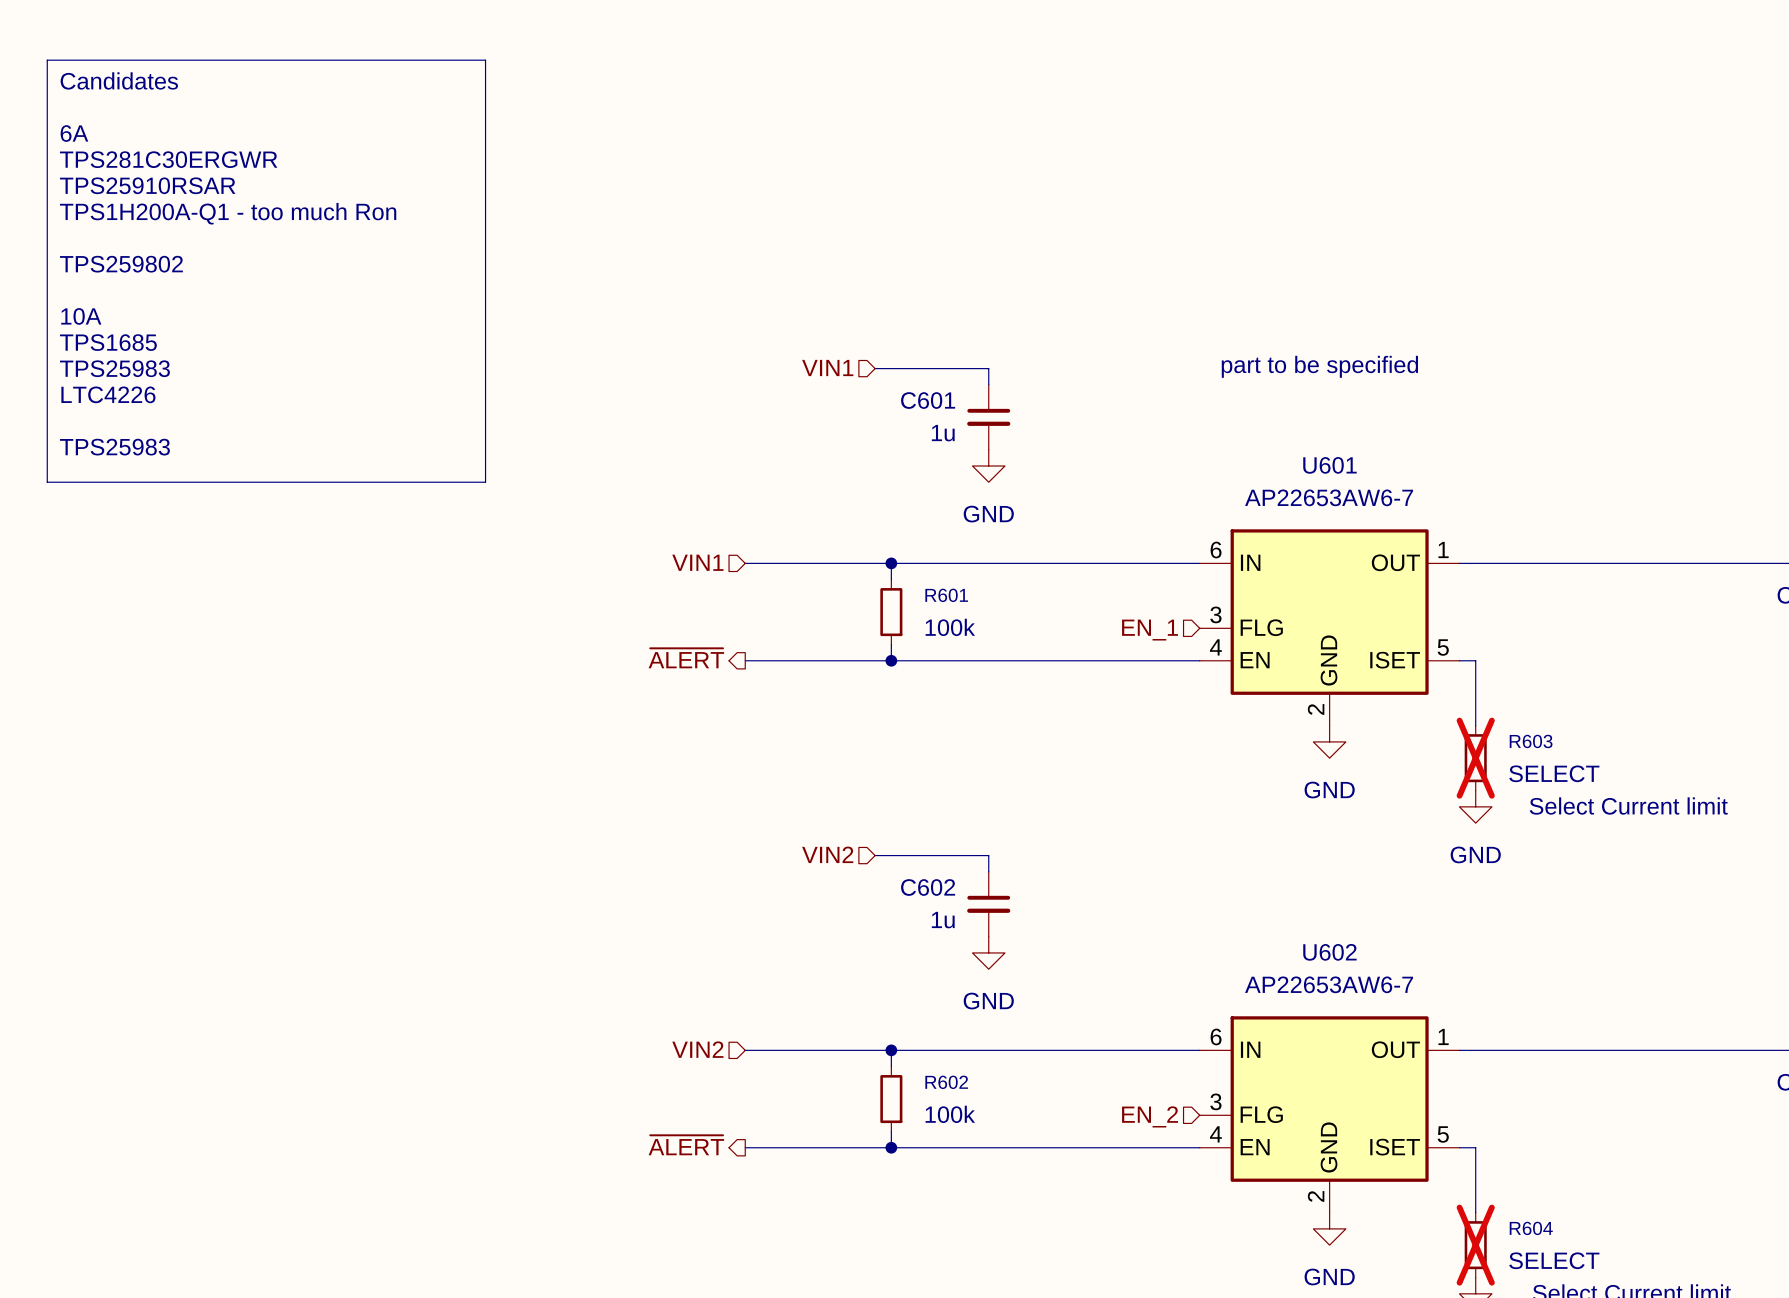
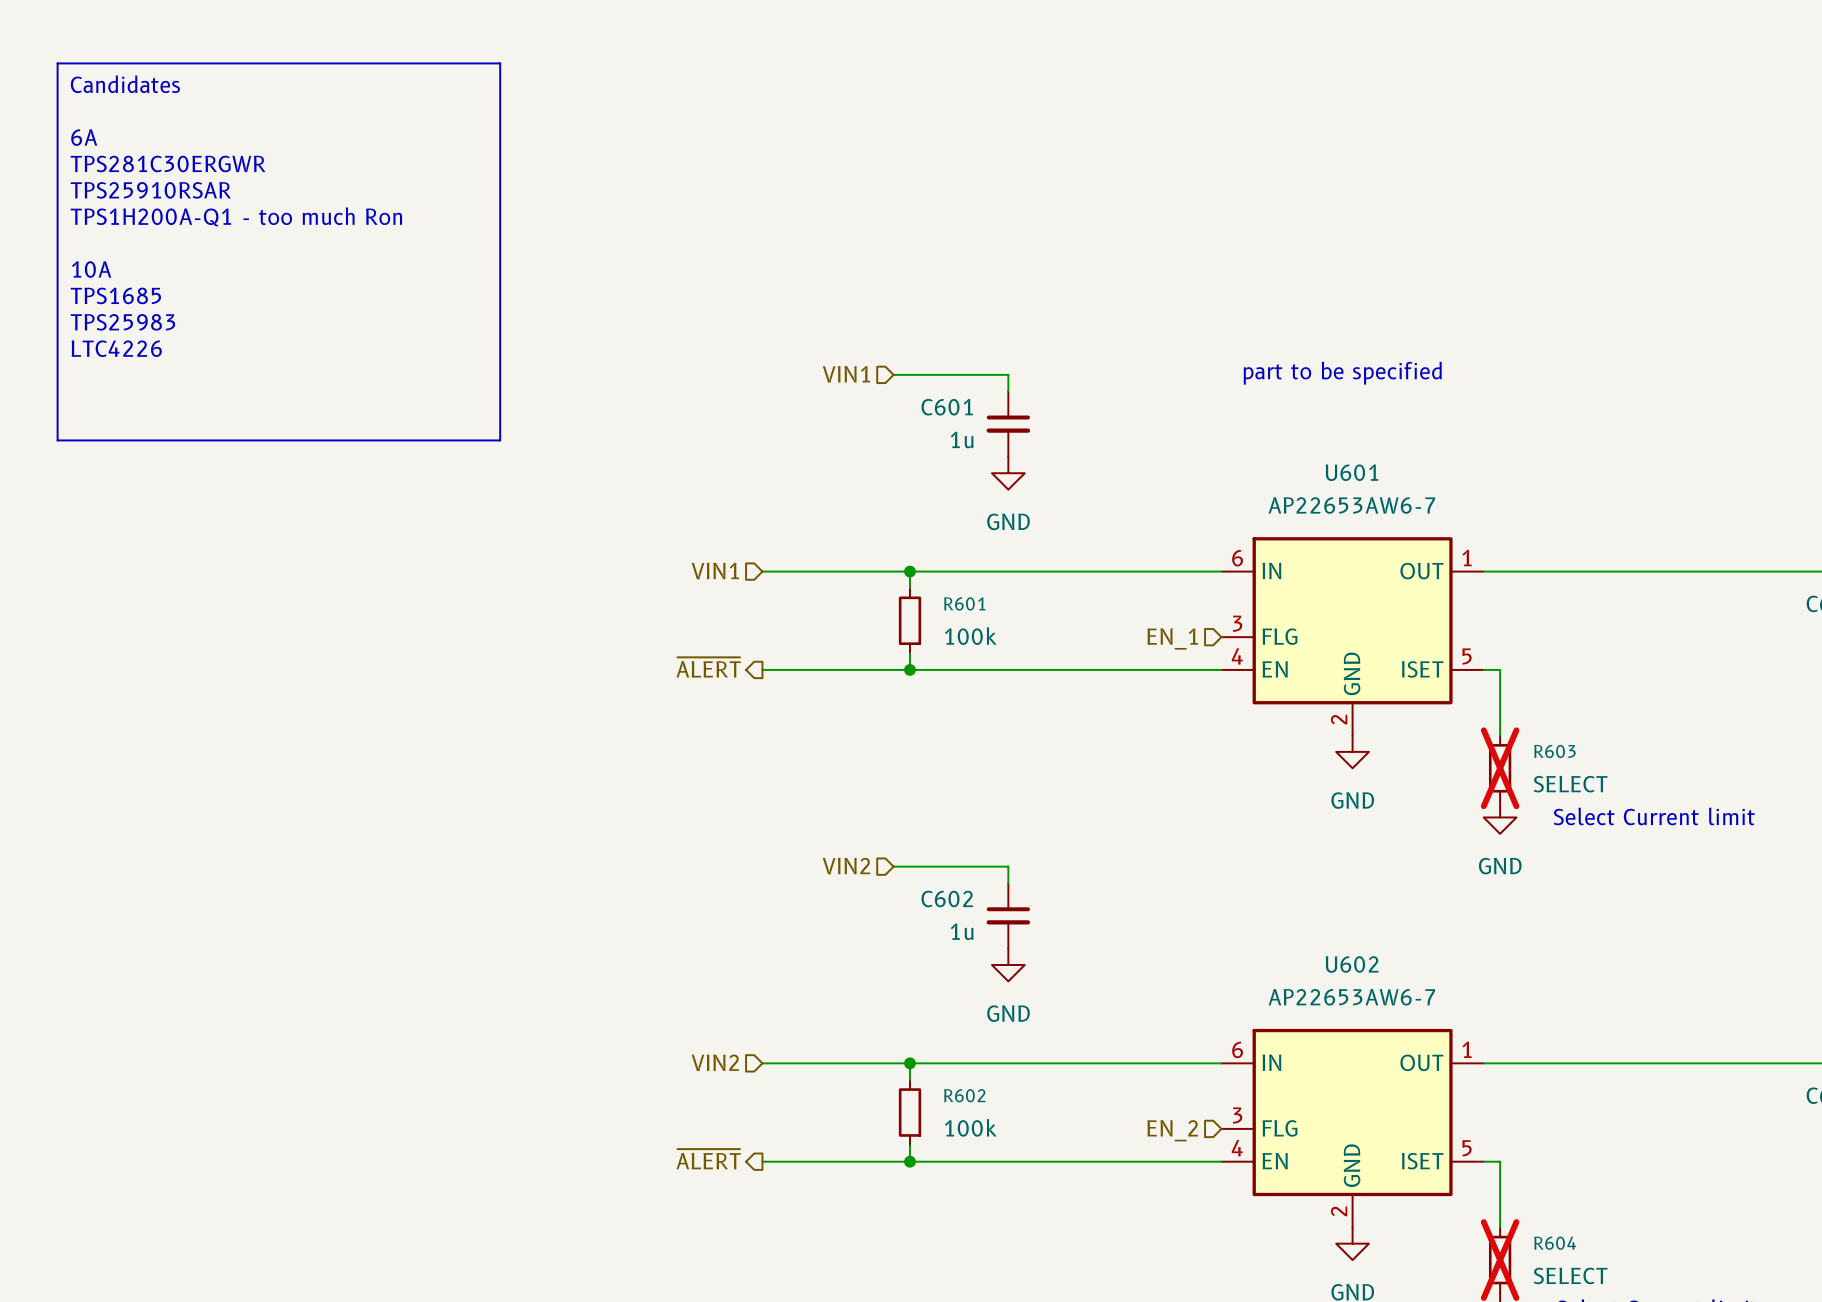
text: TPS259802 (121, 264) -> 10A (91, 269)
text: none -> TPS1685 (115, 295)
text: 10A (81, 316) -> TPS25983 (122, 322)
text: TPS1685 (108, 342) -> LTC4226 (116, 348)
text: TPS25983 (114, 368) -> none
text: LTC4226 (108, 394) -> none
line: (47, 433) (47, 482) (485, 482) (485, 433) -> (57, 440) (500, 440)
text: TPS25983 (114, 447) -> none

